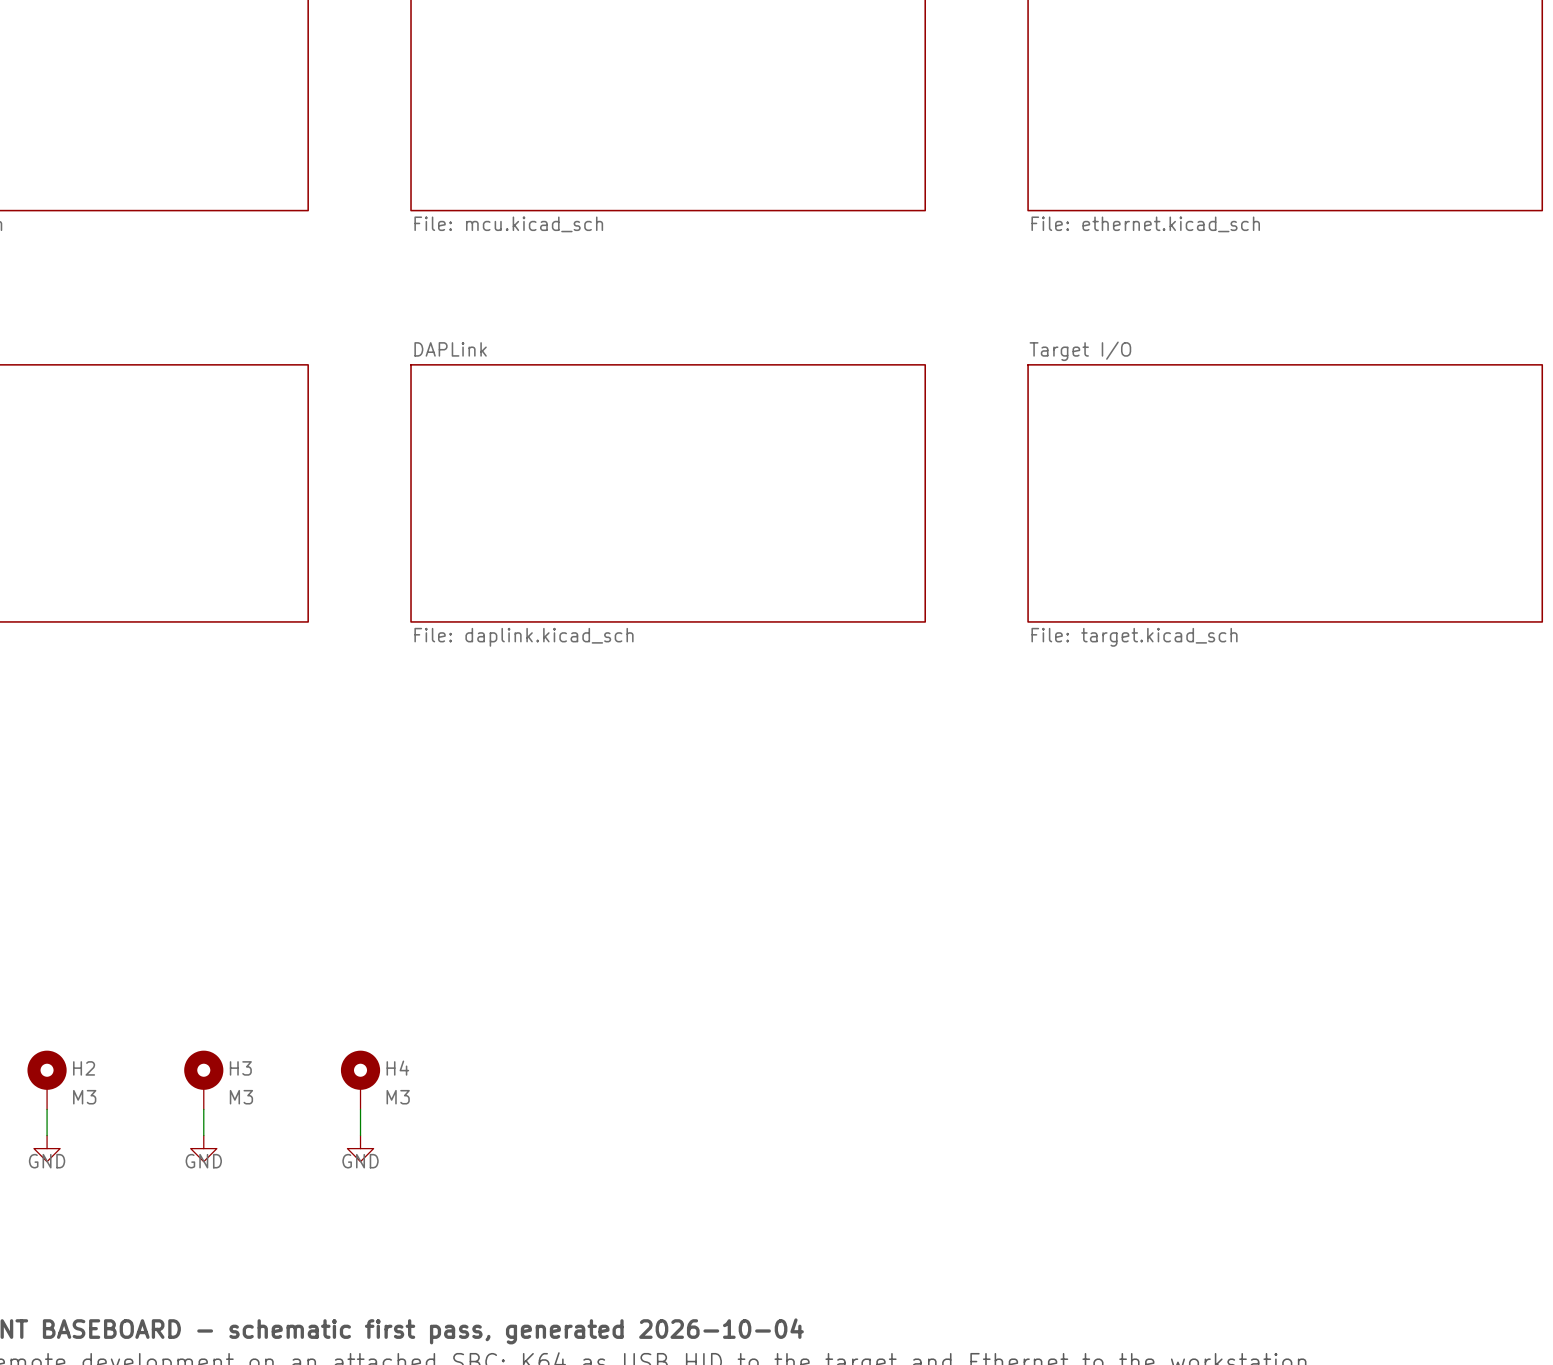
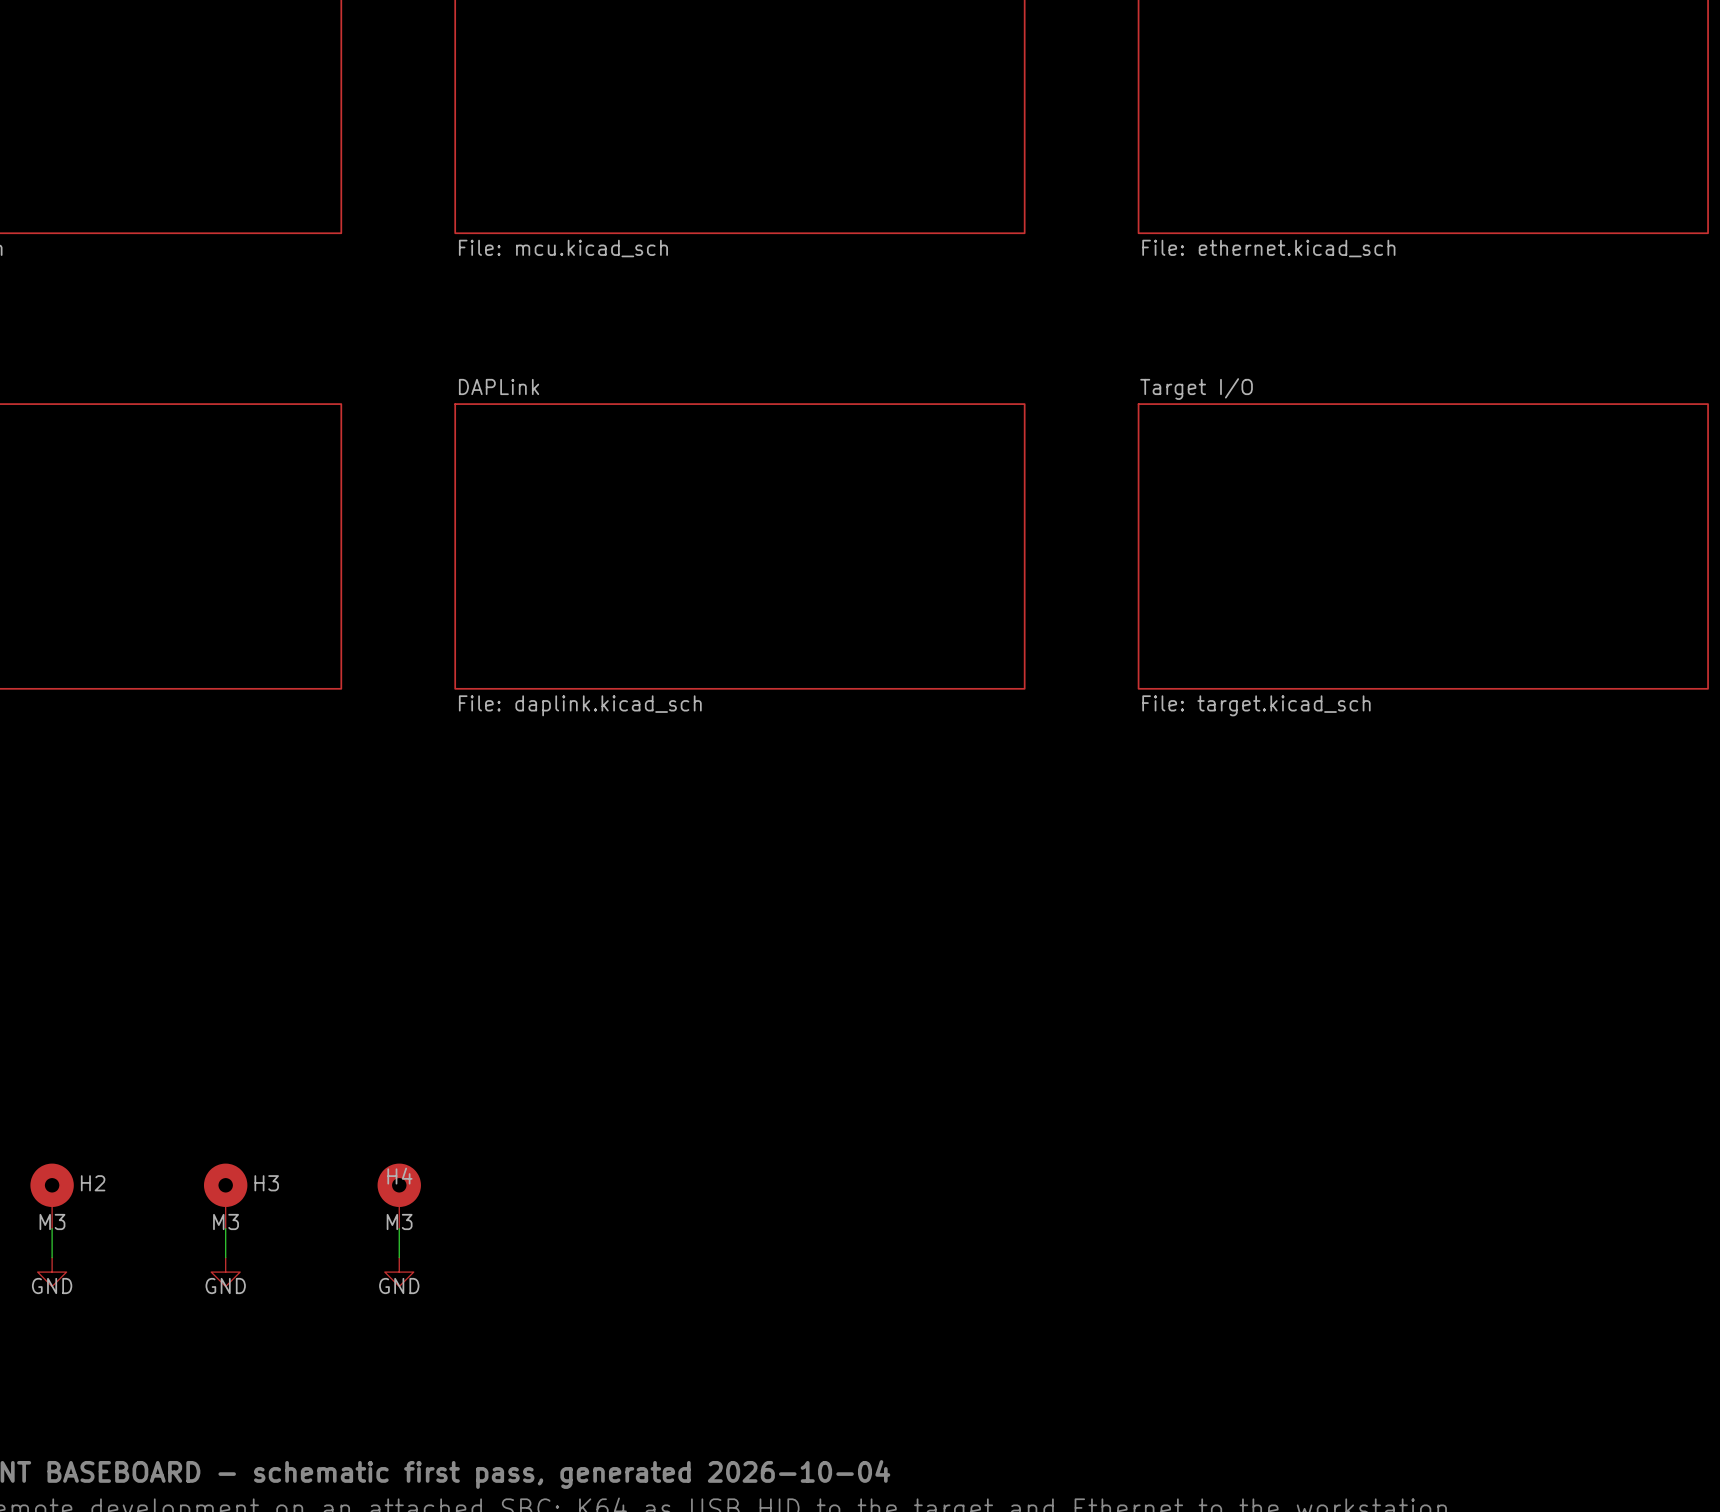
H4 name position: H4 (397, 1068) -> H4 (399, 1176)
H2 value position: M3 (84, 1097) -> M3 (52, 1221)
H3 value position: M3 (241, 1097) -> M3 (226, 1221)
H4 value position: M3 (398, 1097) -> M3 (399, 1221)

